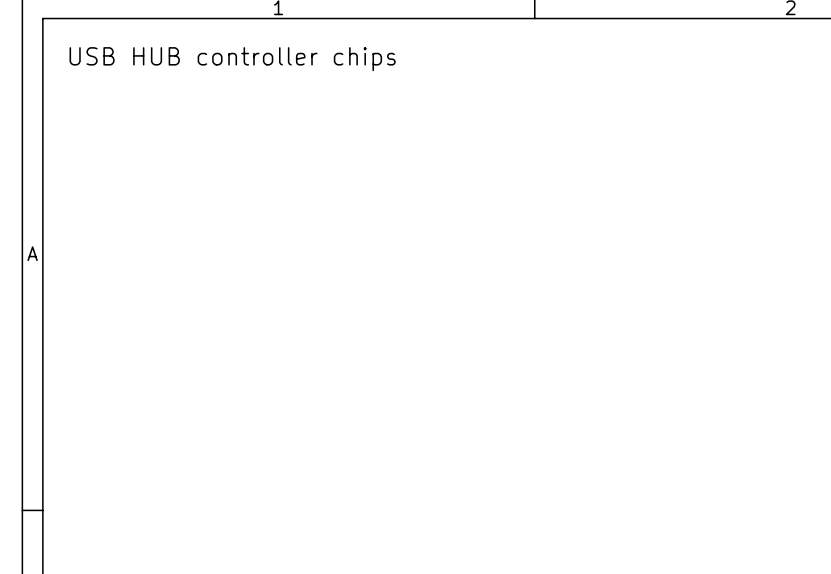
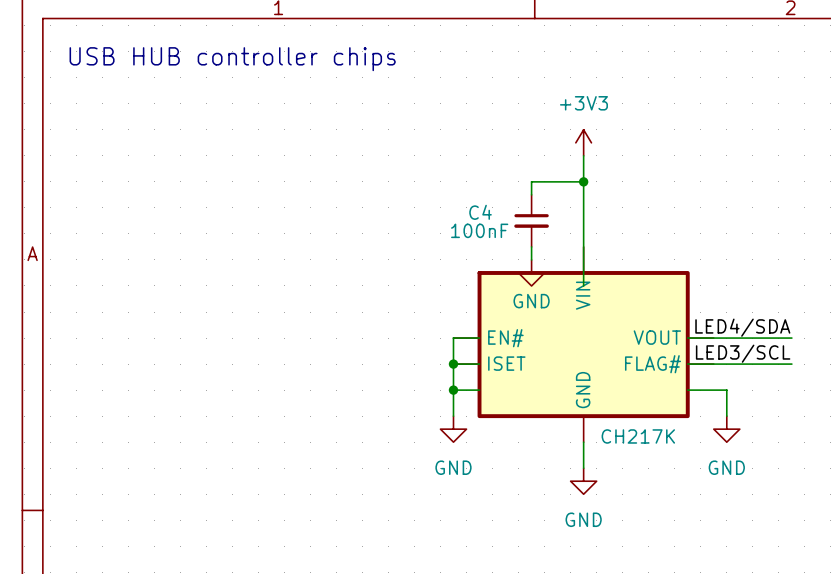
power symbol: none -> +3V3 (583, 142)
wire: none -> (583, 155) (583, 285)
wire: none -> (583, 181) (531, 181) (531, 194)
junction: none -> (583, 181)
C4: none -> 100nF (531, 220)
wire: none -> (531, 246) (531, 259)
power symbol: none -> GND (531, 272)
label: none -> LED4/SDA (742, 327)
wire: none -> (479, 338) (453, 338) (453, 416)
wire: none -> (687, 338) (791, 338)
CH217K: none -> (583, 344)
label: none -> LED3/SCL (743, 353)
wire: none -> (453, 364) (479, 364)
junction: none -> (453, 364)
wire: none -> (687, 364) (791, 364)
wire: none -> (453, 390) (479, 390)
junction: none -> (453, 390)
wire: none -> (687, 390) (726, 390) (726, 416)
power symbol: none -> GND (453, 429)
power symbol: none -> GND (726, 429)
wire: none -> (583, 442) (583, 468)
power symbol: none -> GND (583, 481)

